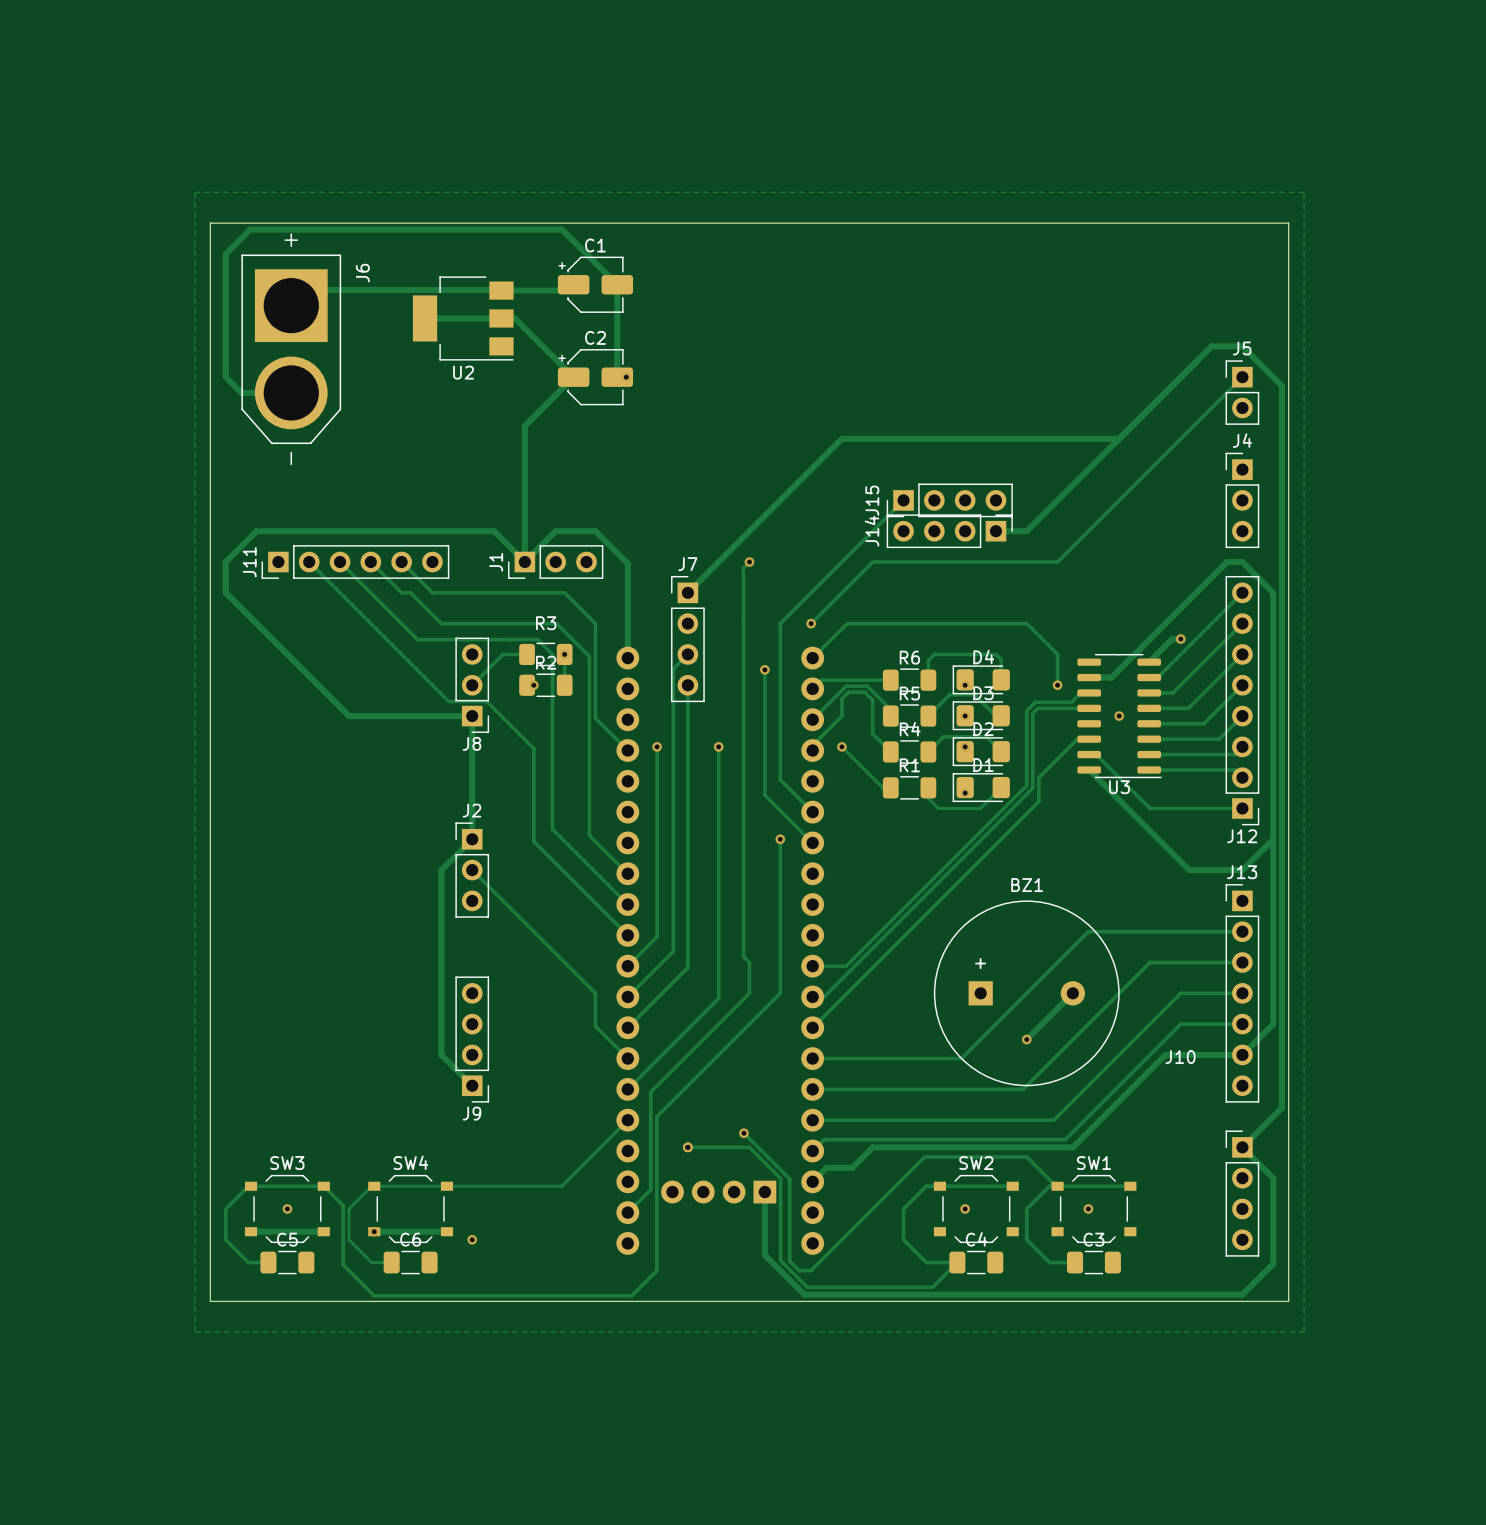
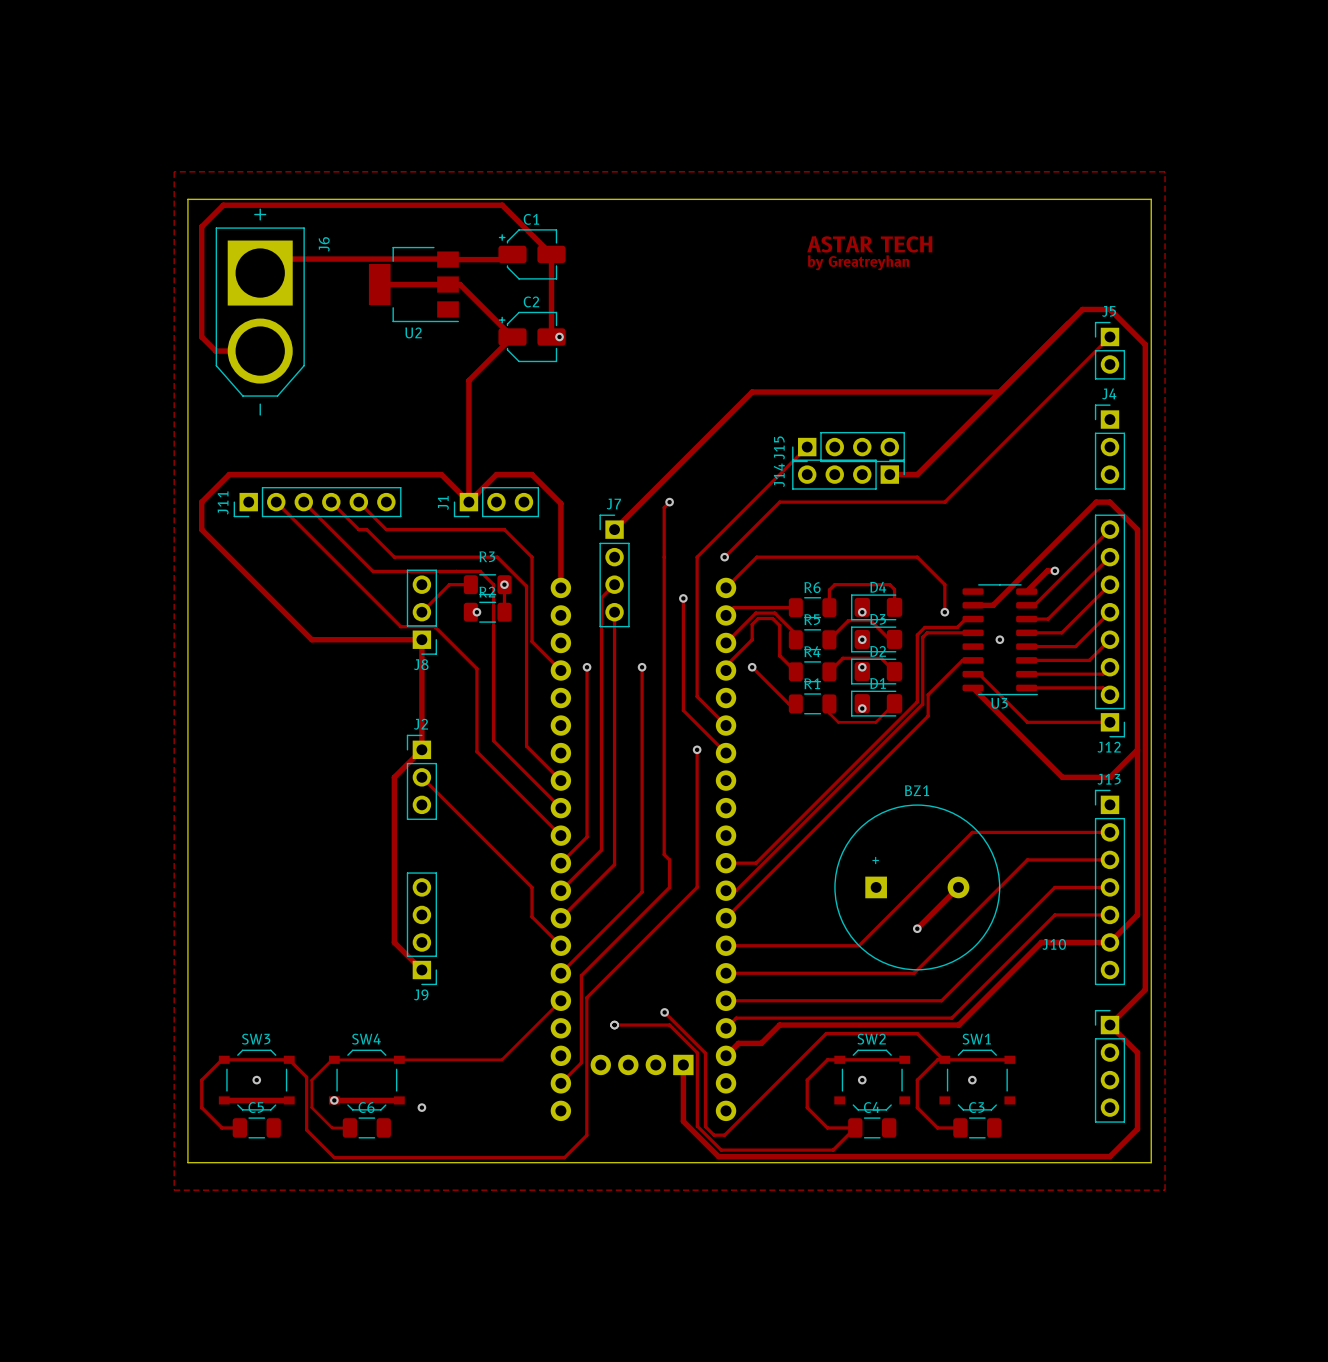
text: none -> ASTAR TECH (869, 244)
text: none -> by Greatreyhan (858, 262)

